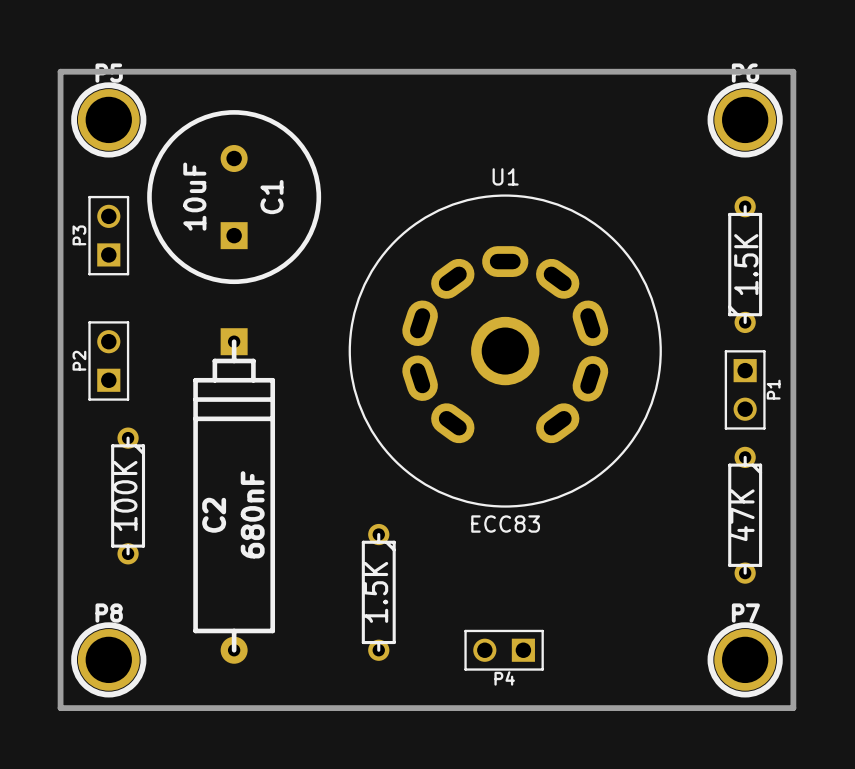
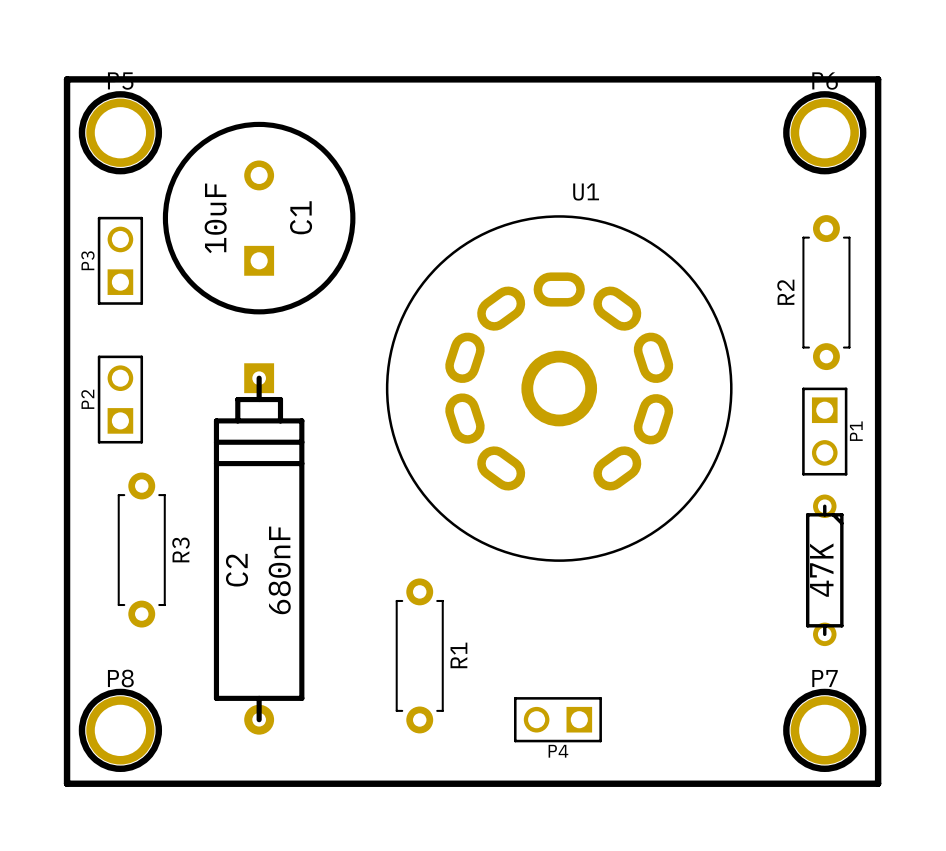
U1 name position: U1 (505, 176) -> U1 (586, 192)
part: 1.5K (745, 264) -> none
R2: none -> (826, 292)
part: 100K (128, 495) -> none
R3: none -> (141, 550)
U1 value: ECC83 (505, 524) -> none
part: 1.5K (378, 592) -> none
R1: none -> (419, 655)

